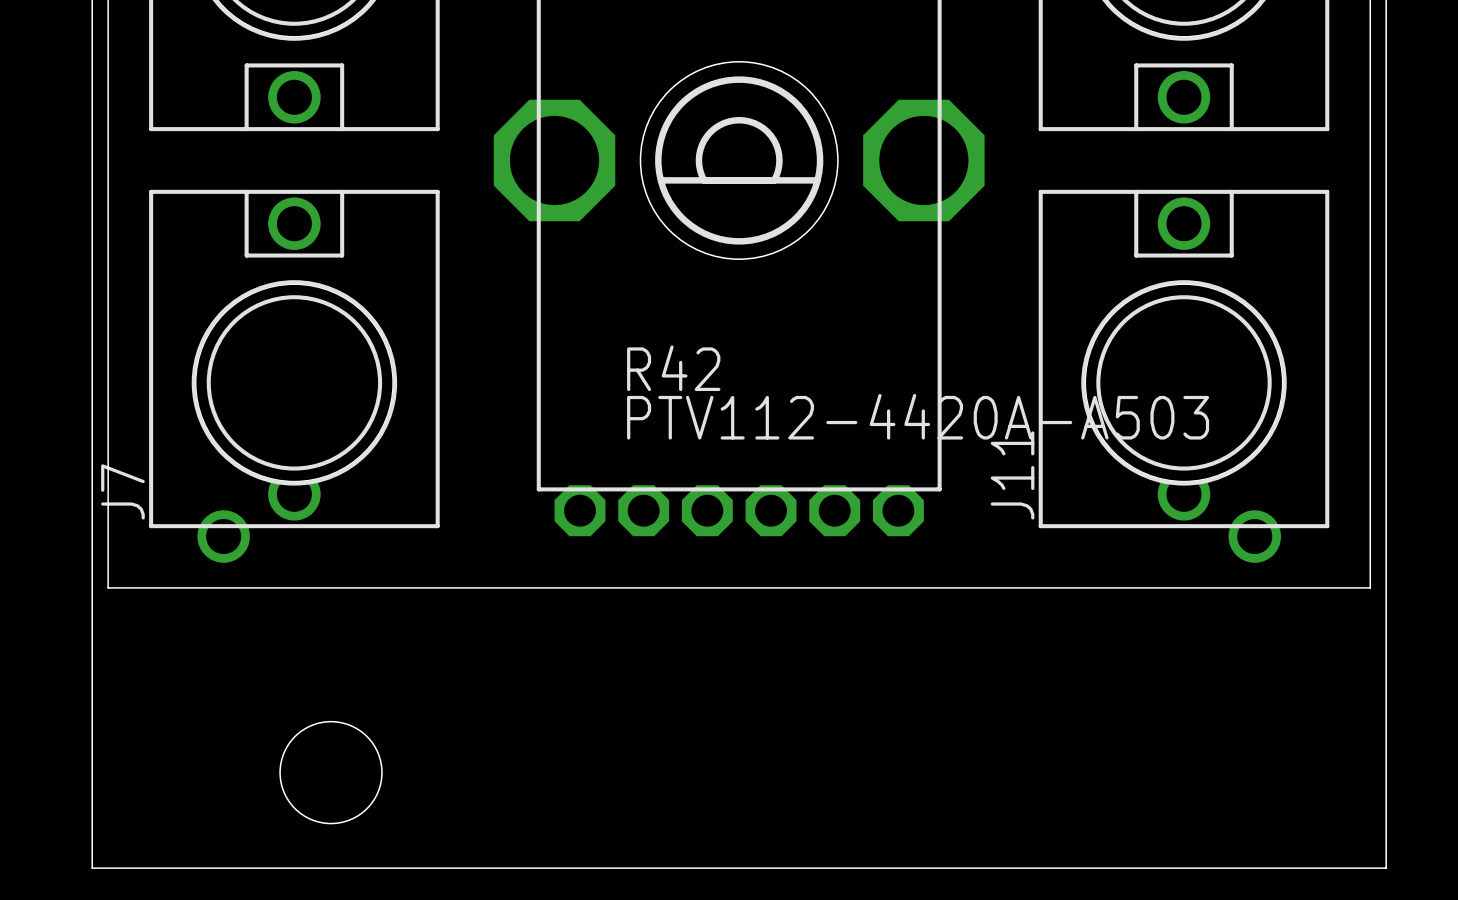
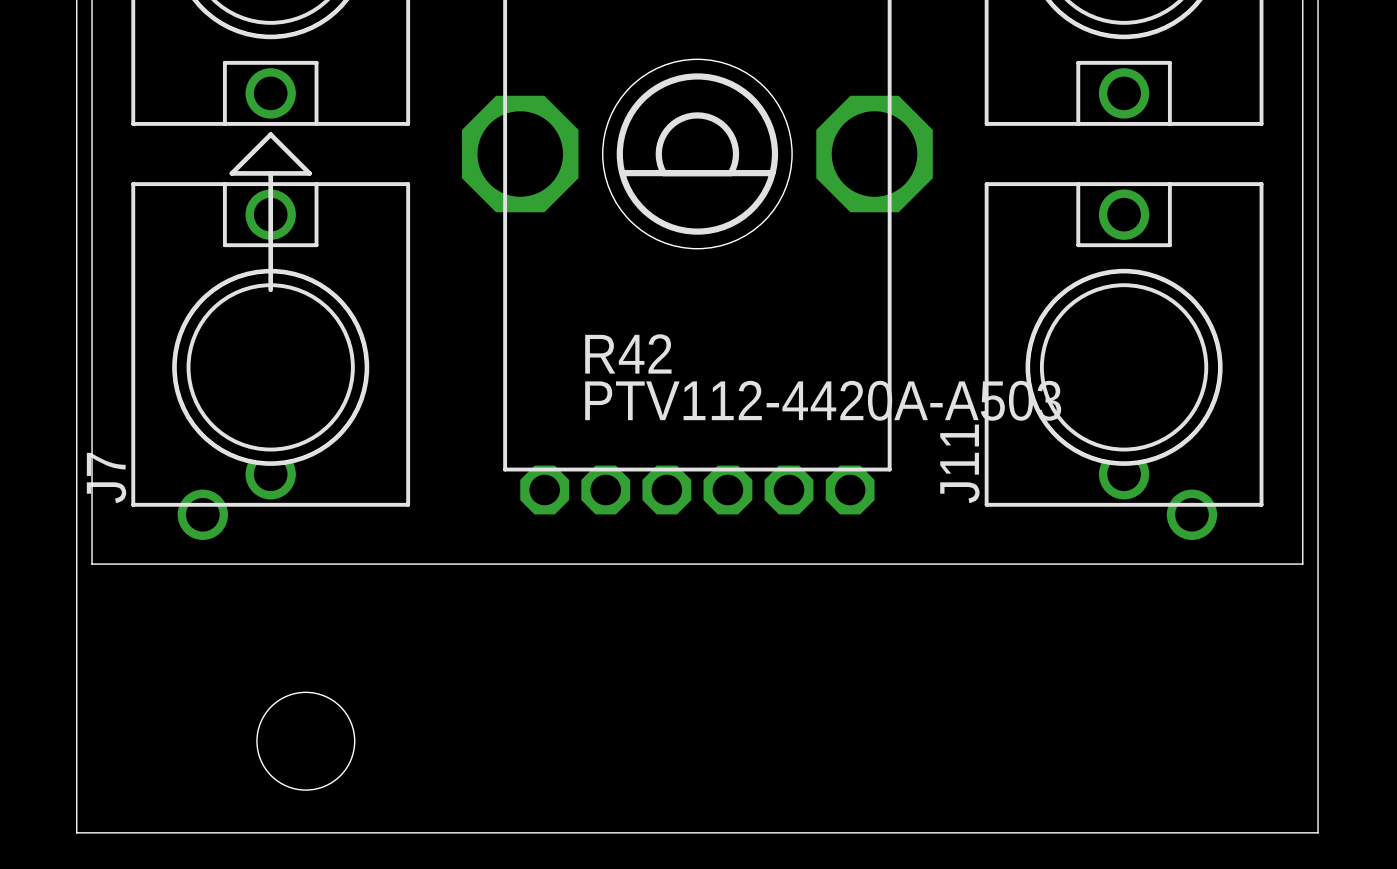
line: none -> (270, 134) (231, 173) (309, 173) (270, 134)
line: none -> (270, 173) (270, 289)

